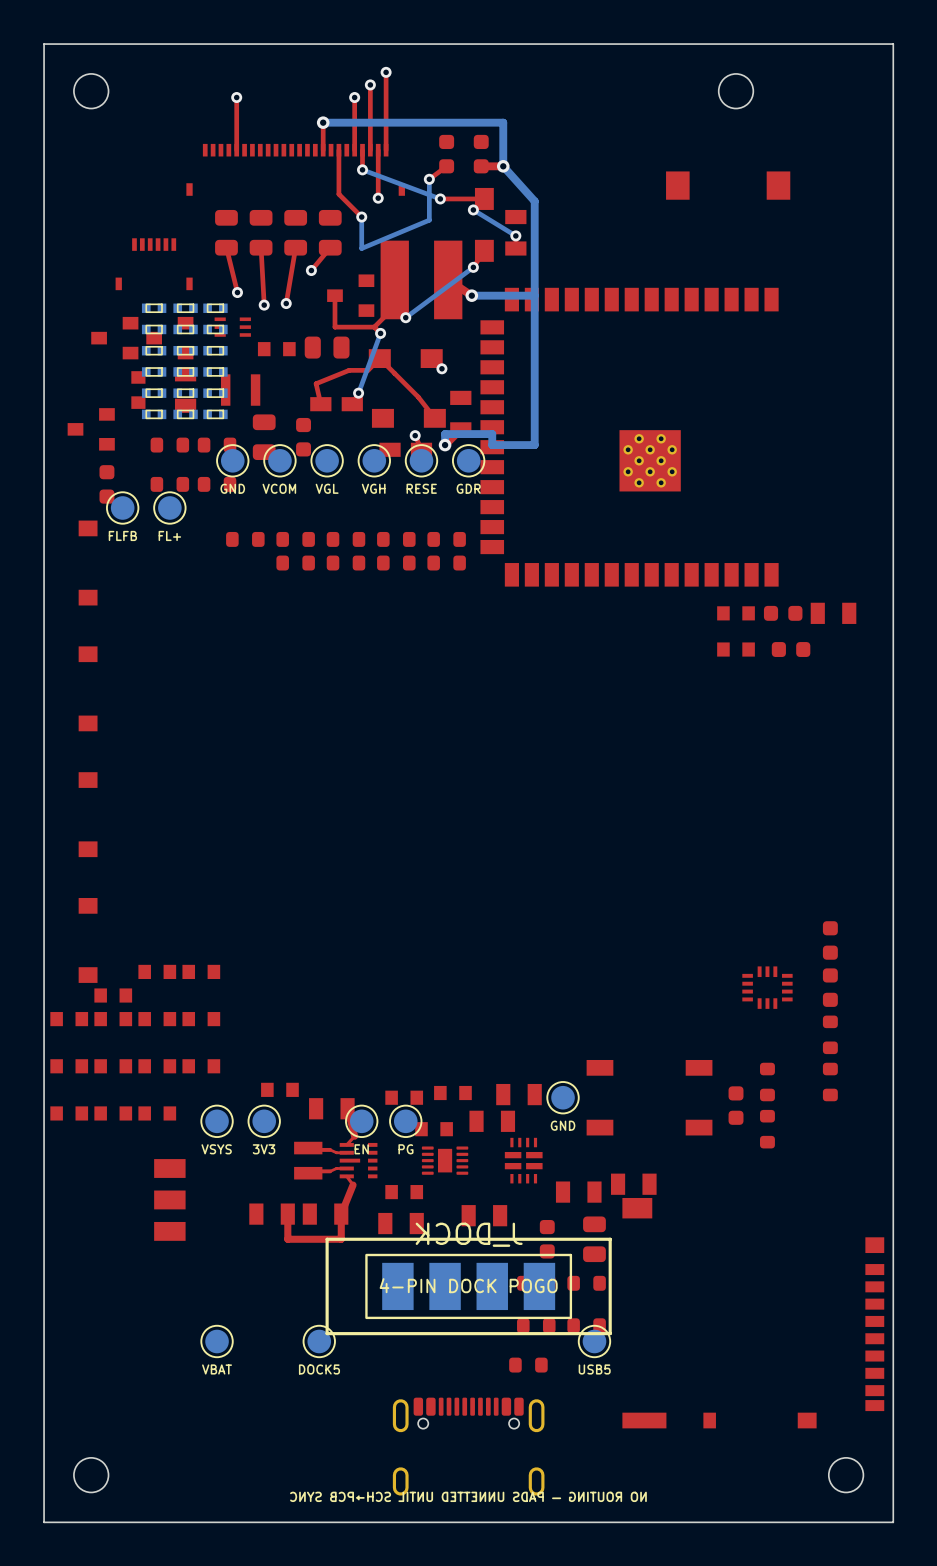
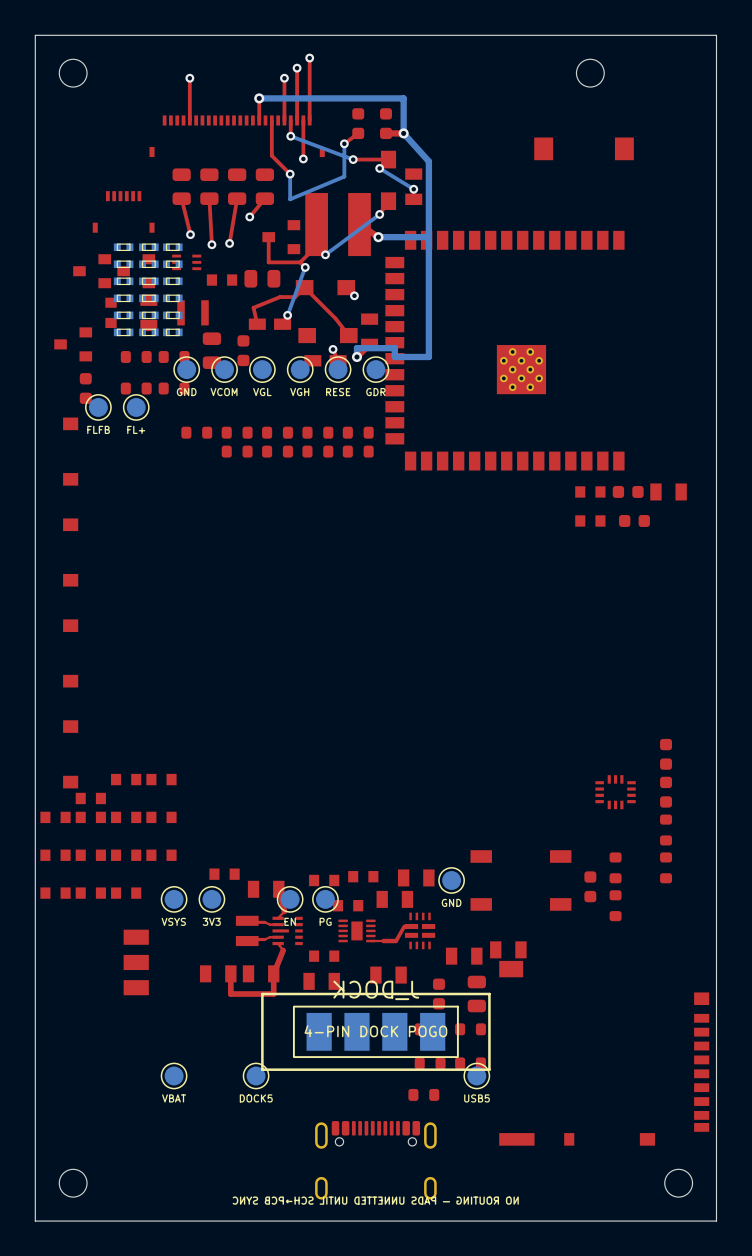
top track: none -> (411, 926) (404, 926) (396, 941) (370, 941)

